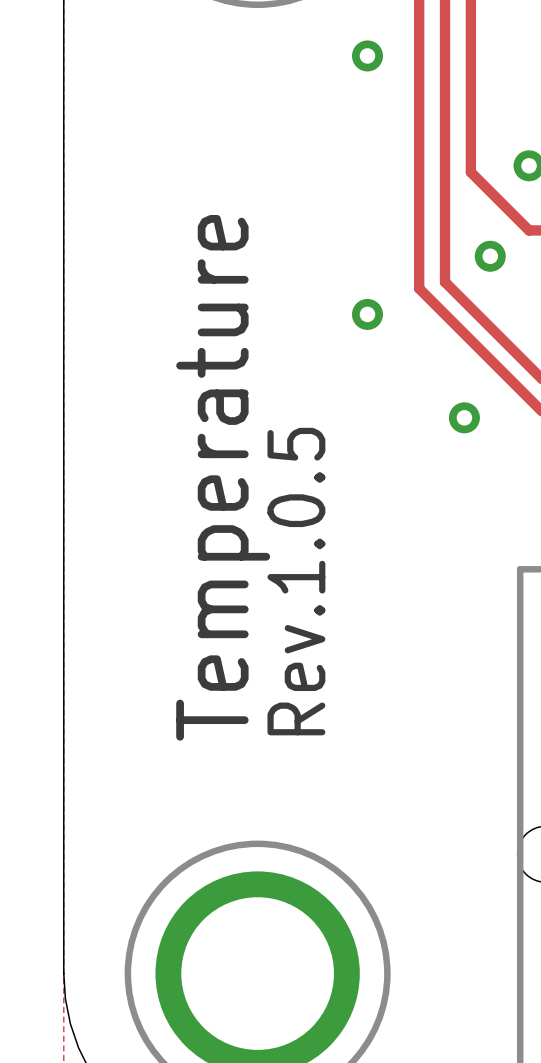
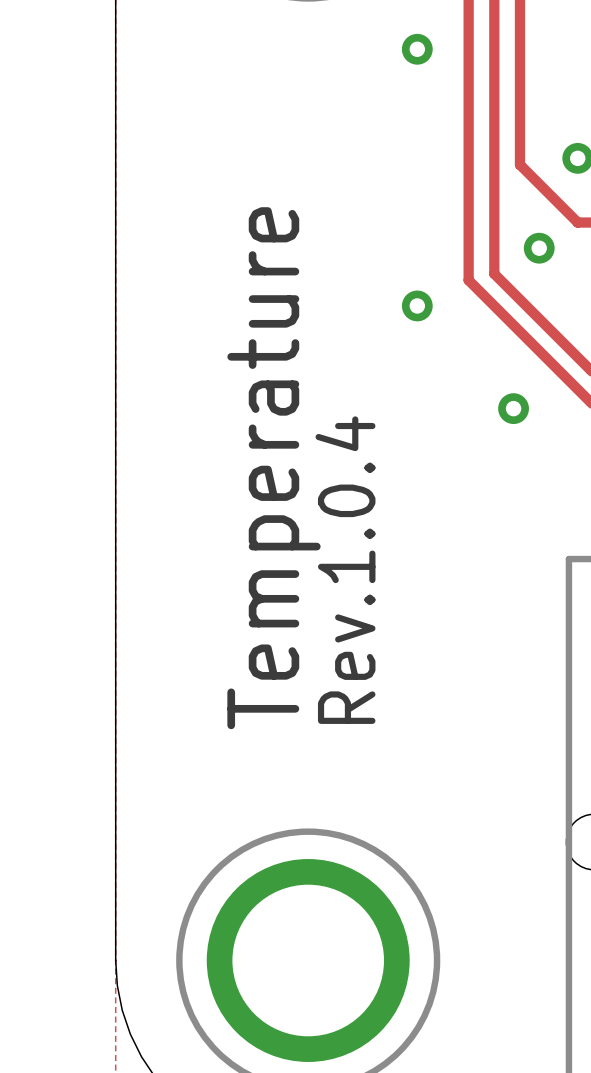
text: Rev.1.0.5 (296, 581) -> Rev.1.0.4 (345, 570)

